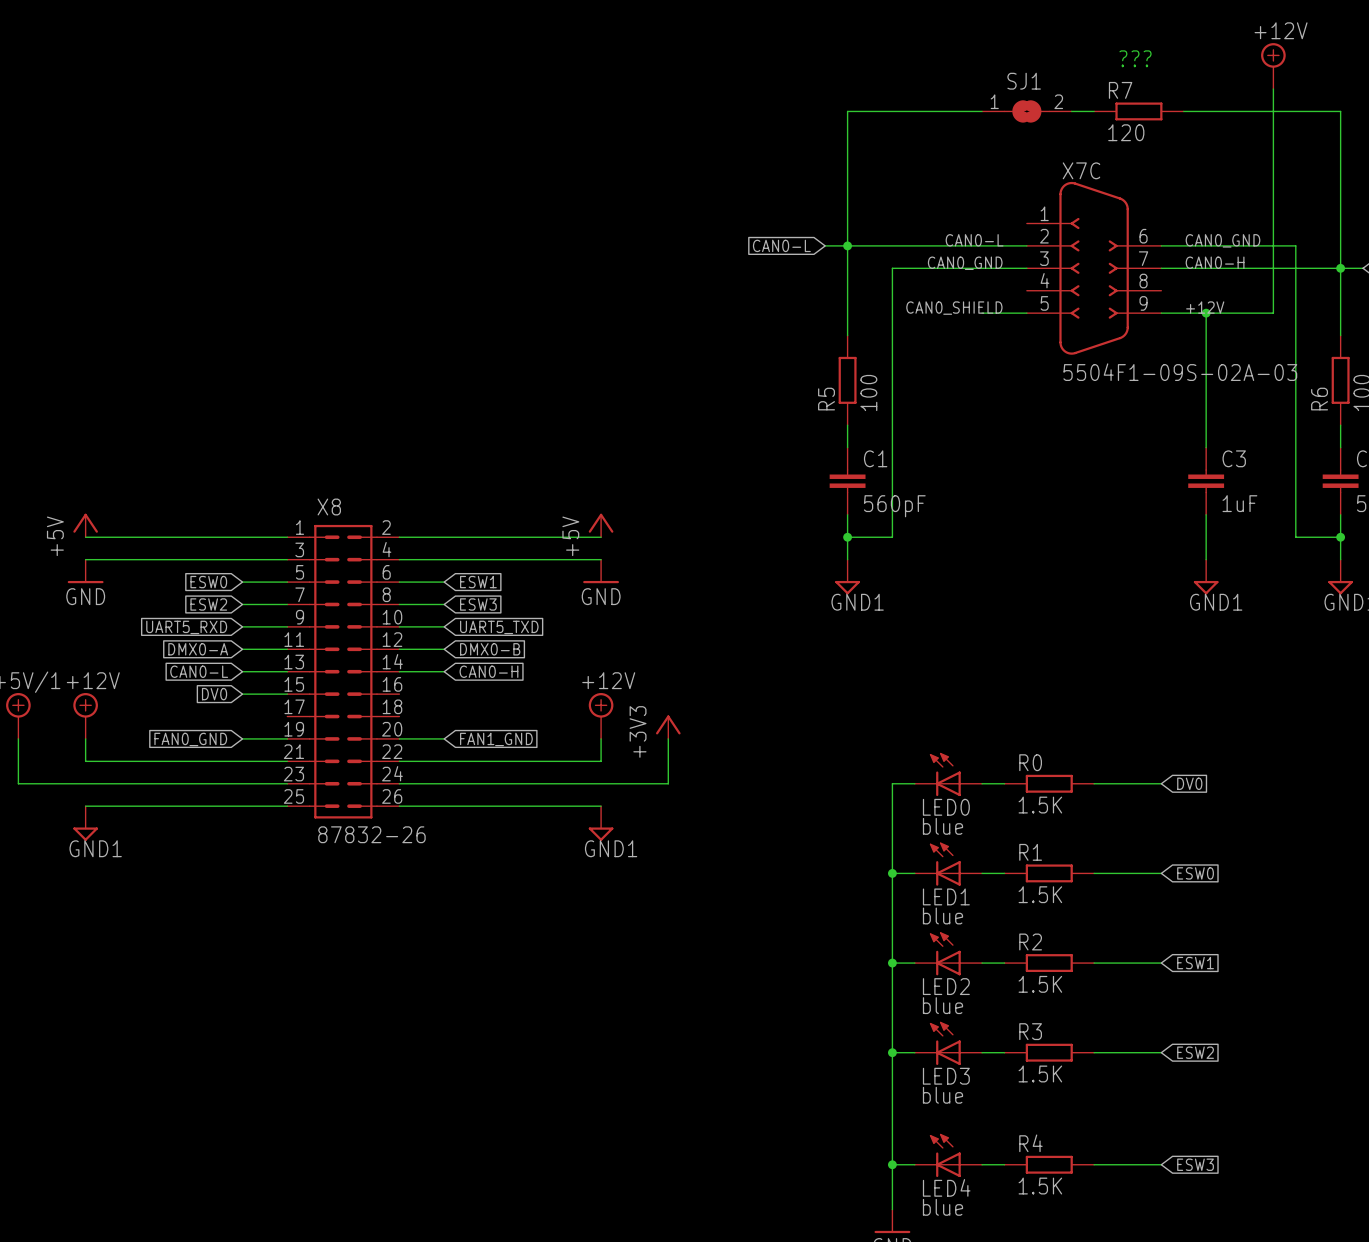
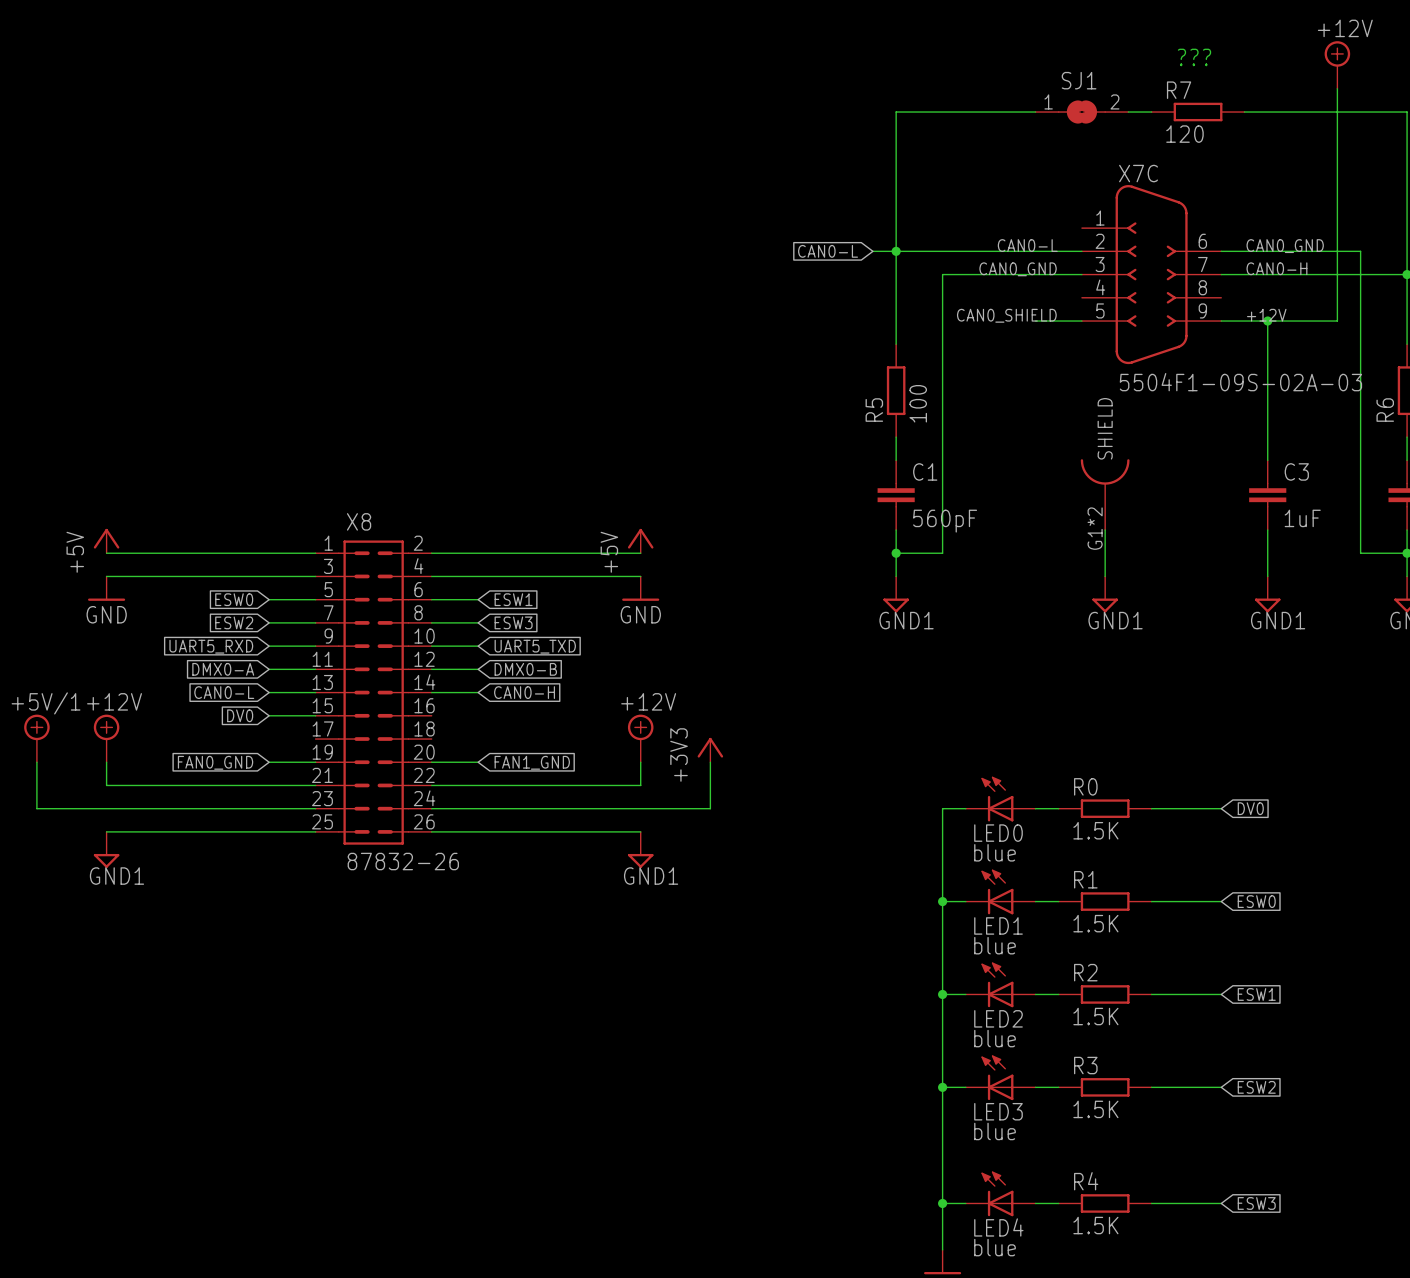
part: none -> (1105, 494)
wire: none -> (1105, 530) (1105, 576)
power symbol: none -> GND1 (1105, 594)

